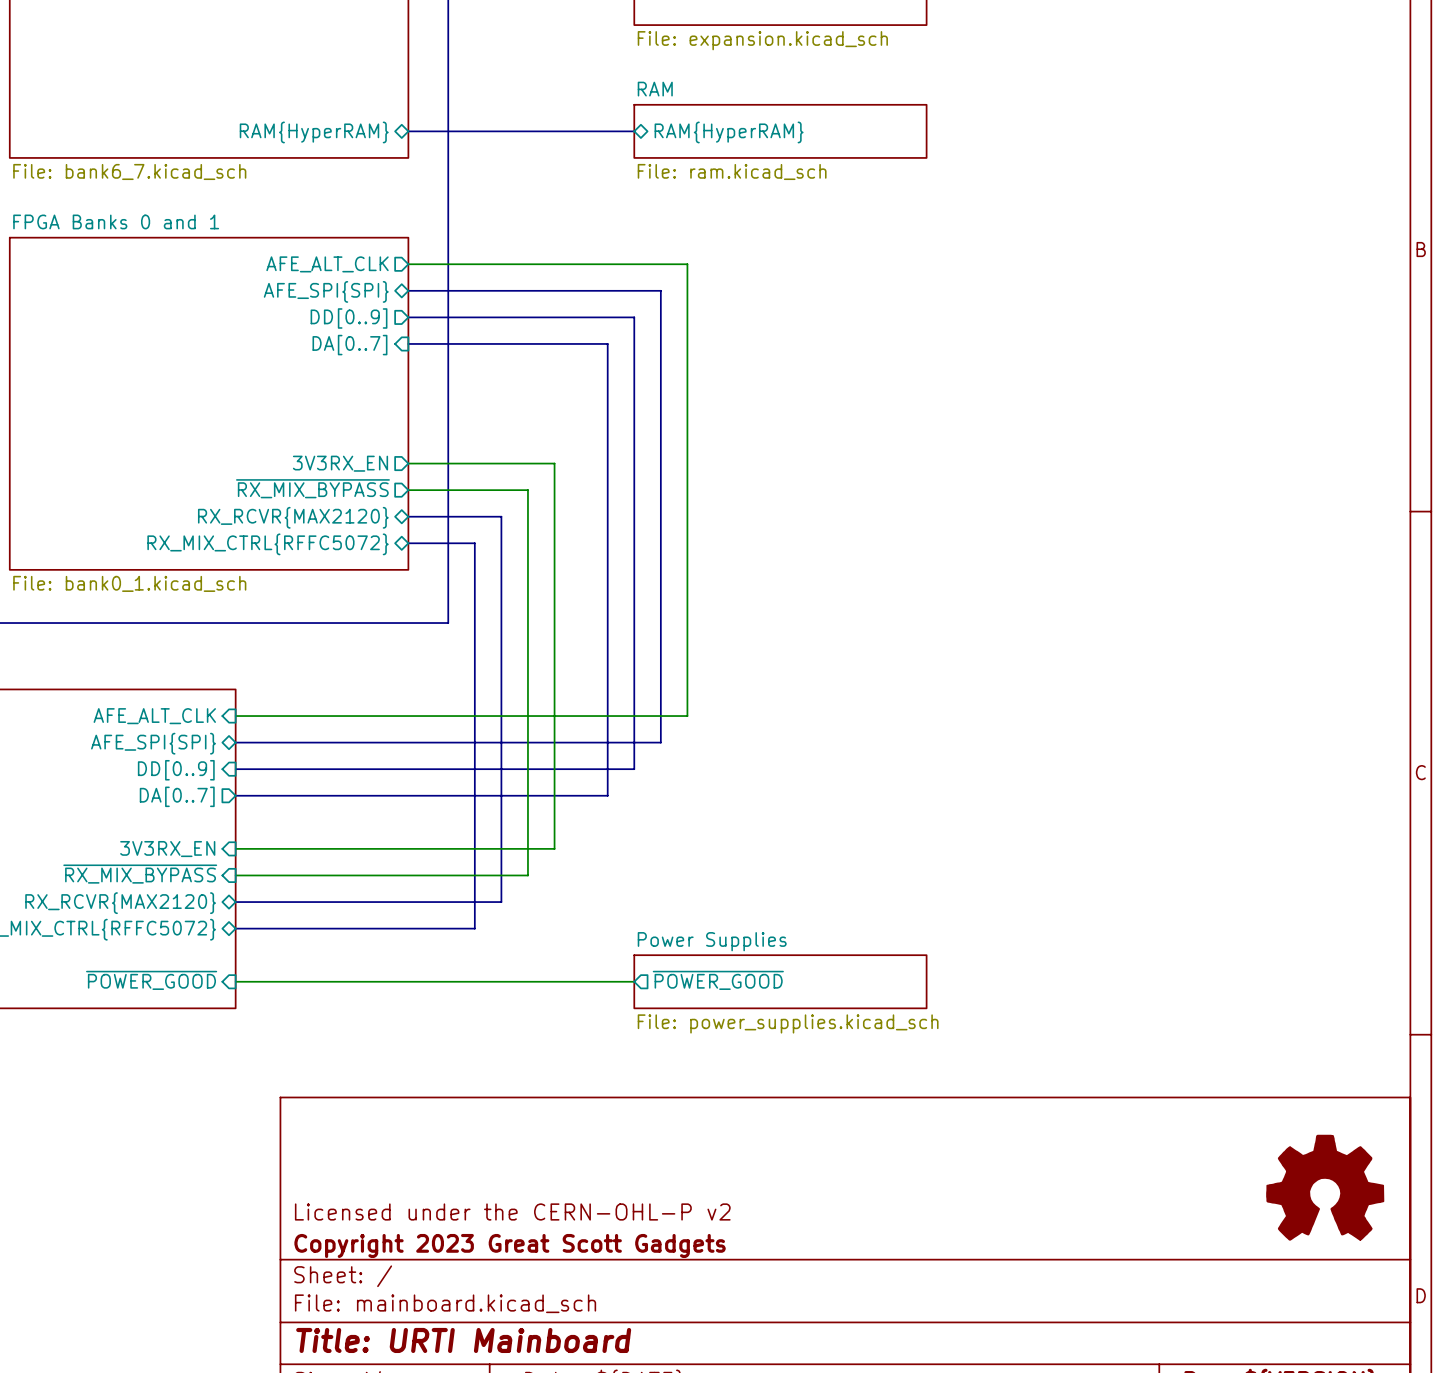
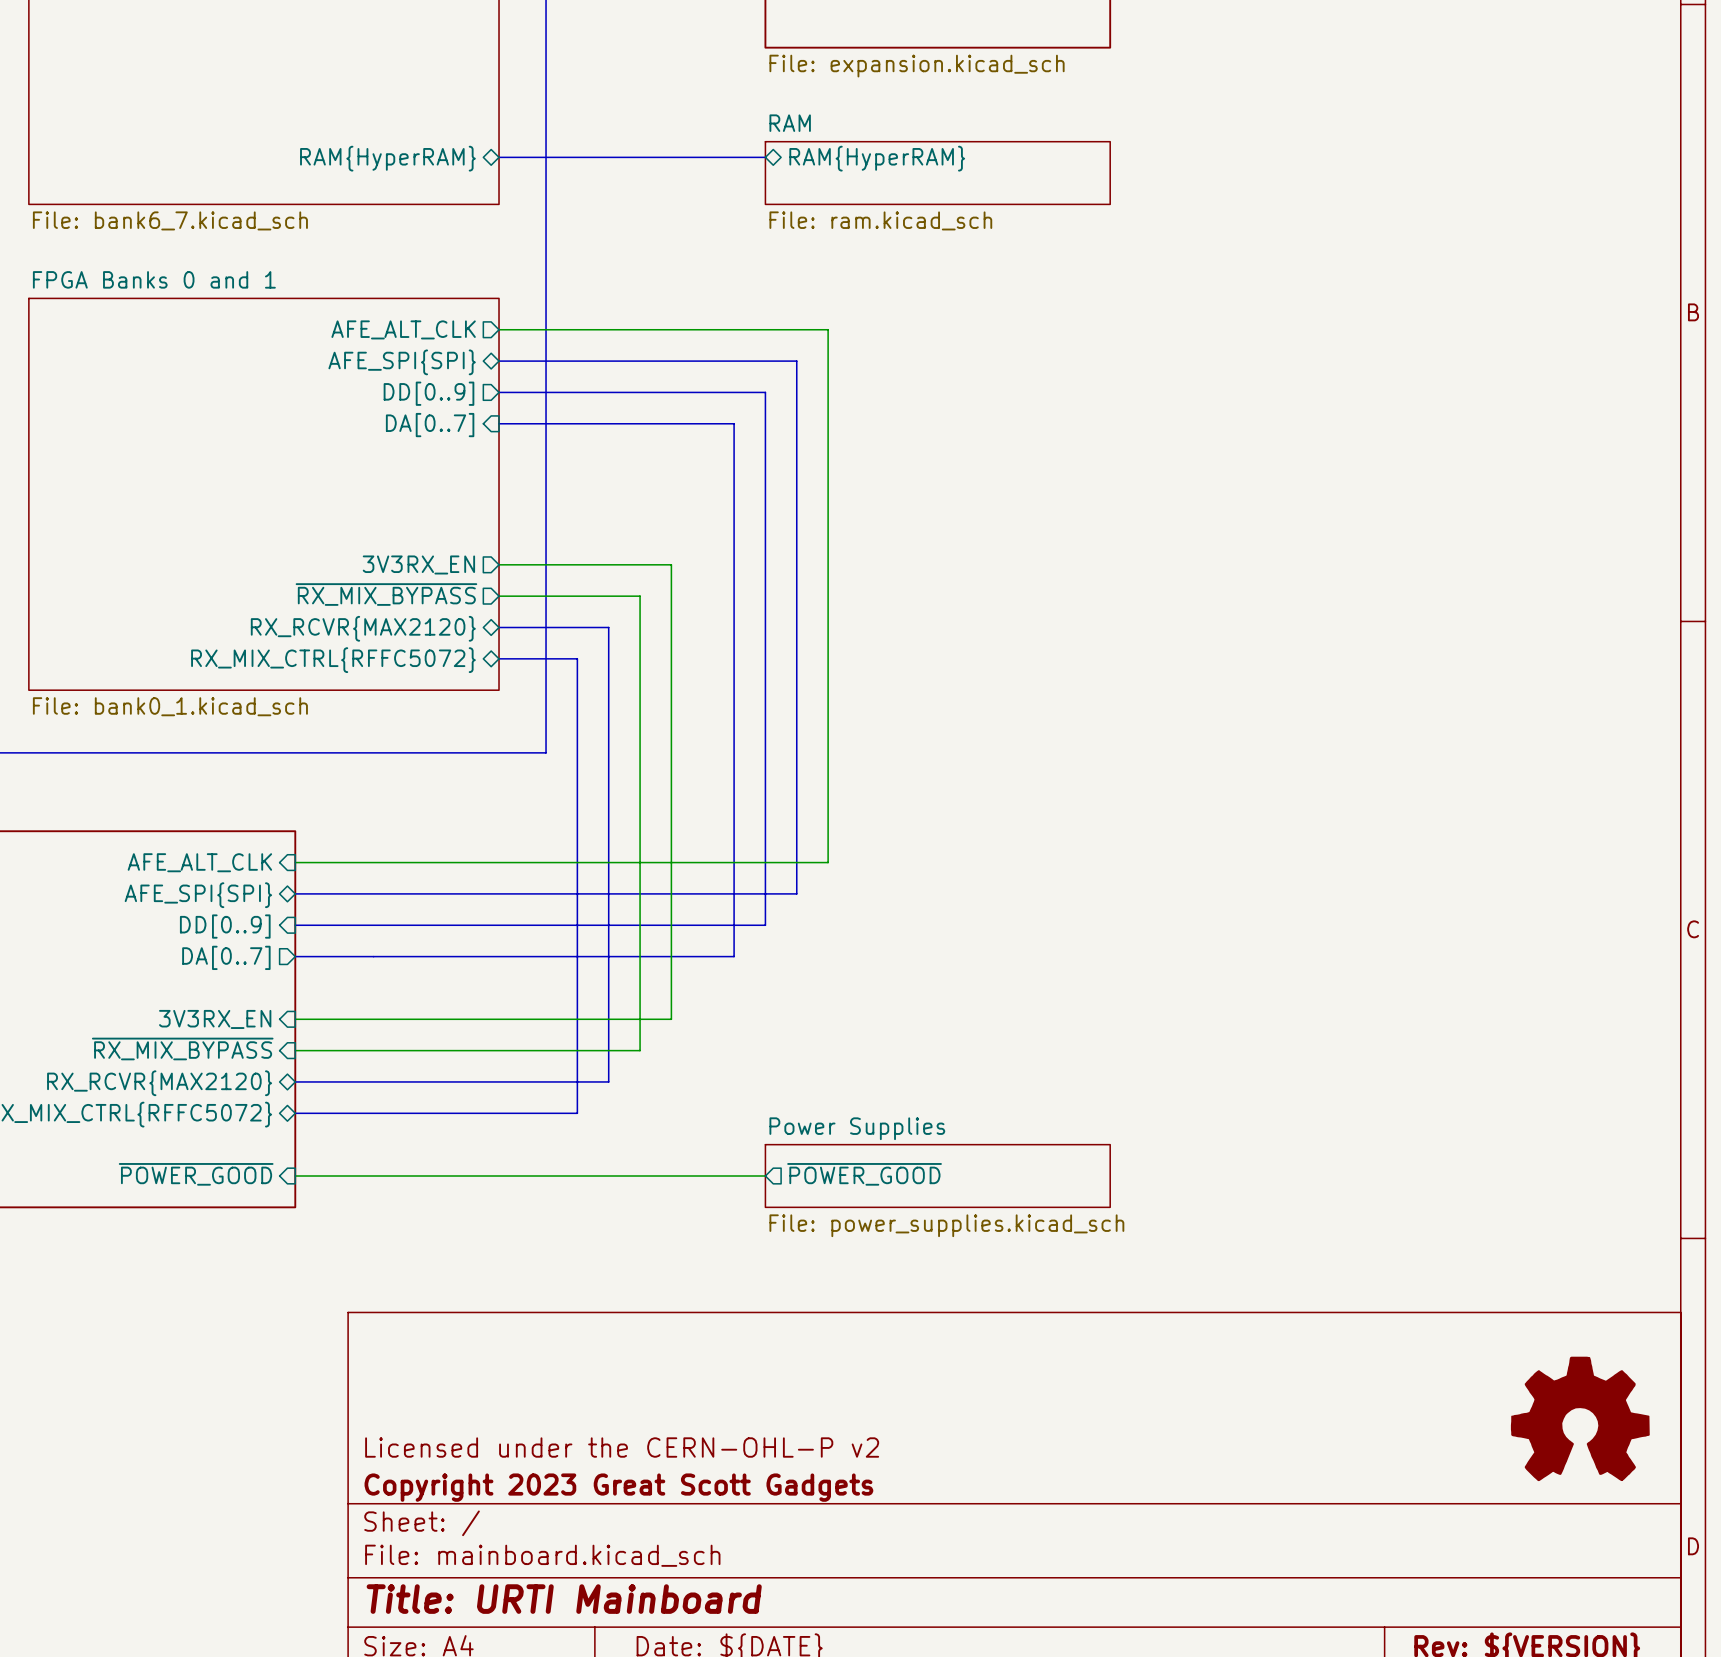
bus: (408, 131) (634, 131) -> (499, 157) (765, 157)
sheet pin position: RAM{HyperRAM} (314, 132) -> RAM{HyperRAM} (387, 158)
sheet pin position: RAM{HyperRAM} (729, 132) -> RAM{HyperRAM} (877, 158)

